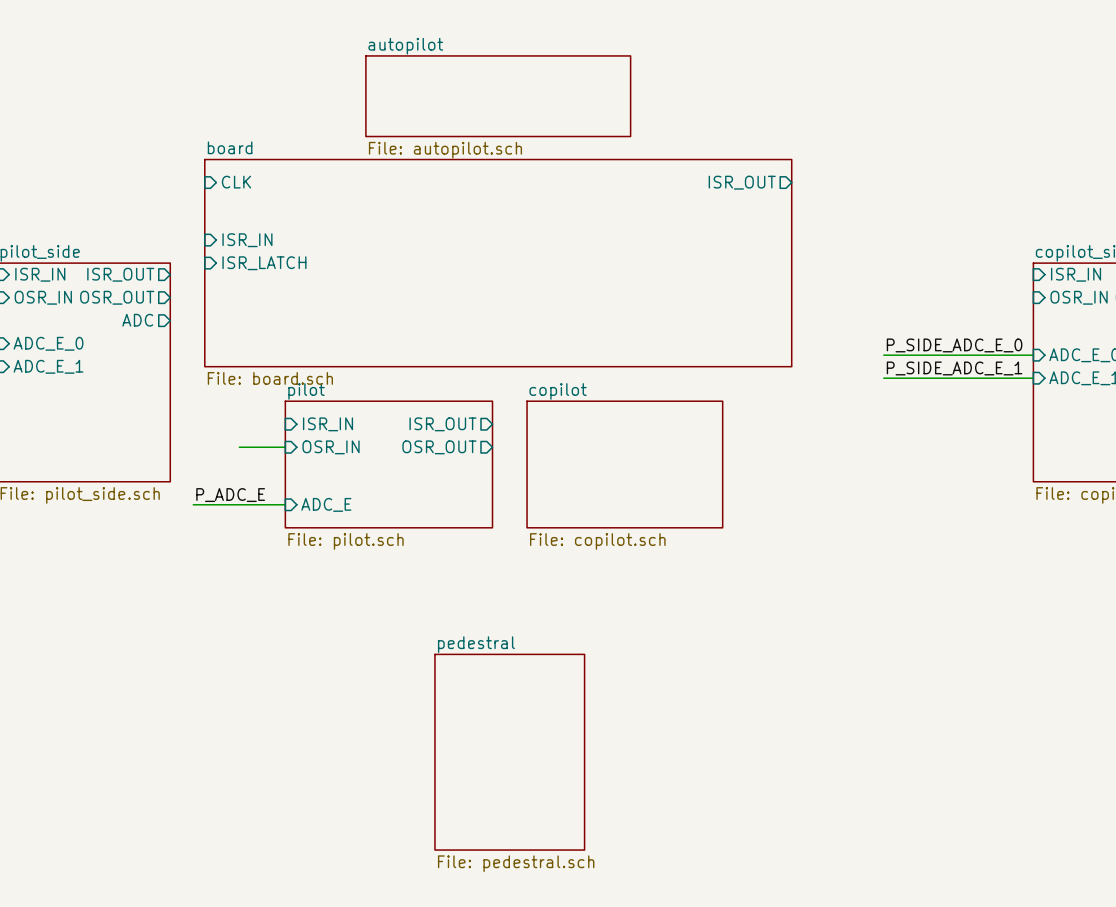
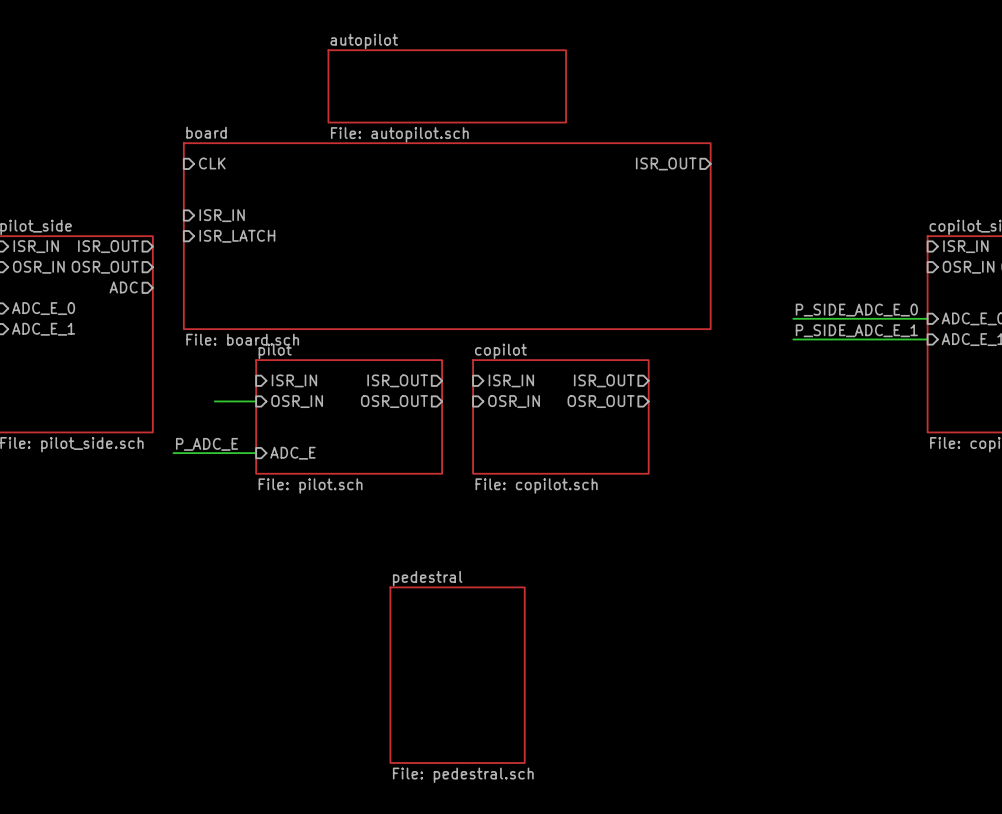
sheet pin: none -> ISR_IN (511, 380)
sheet pin: none -> ISR_OUT (604, 380)
sheet pin: none -> OSR_IN (514, 401)
sheet pin: none -> OSR_OUT (601, 401)

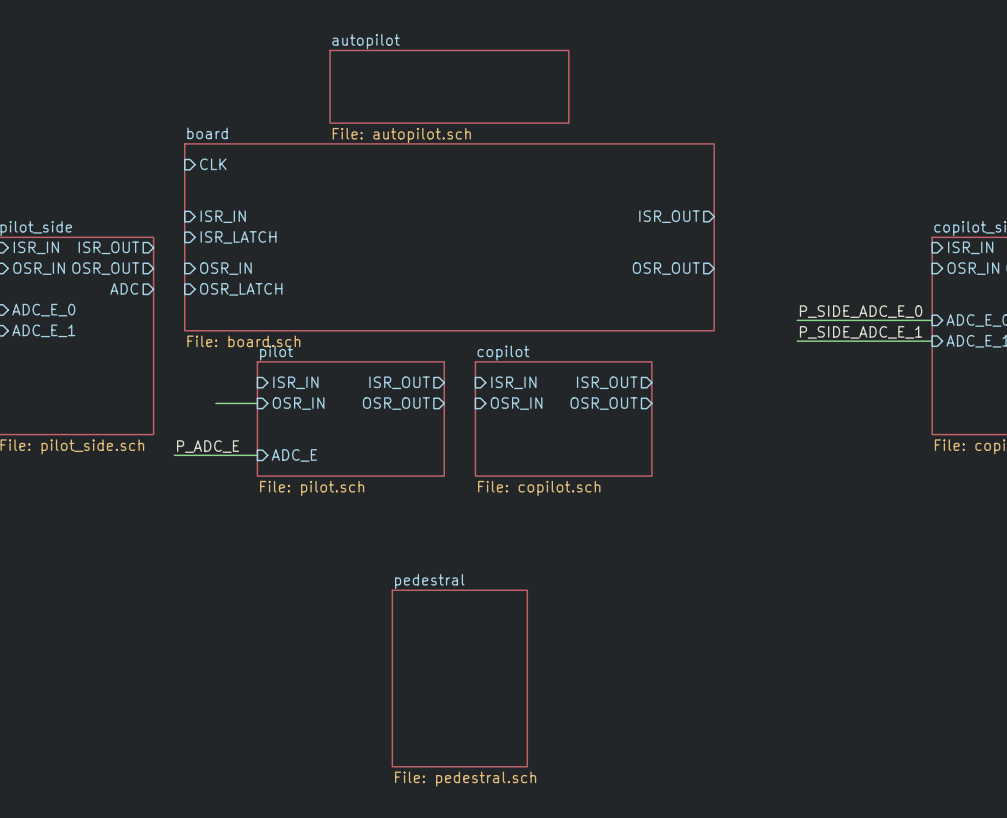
sheet pin position: ISR_OUT (666, 163) -> ISR_OUT (669, 216)
sheet pin: none -> OSR_IN (225, 268)
sheet pin: none -> OSR_OUT (666, 268)
sheet pin: none -> OSR_LATCH (241, 289)

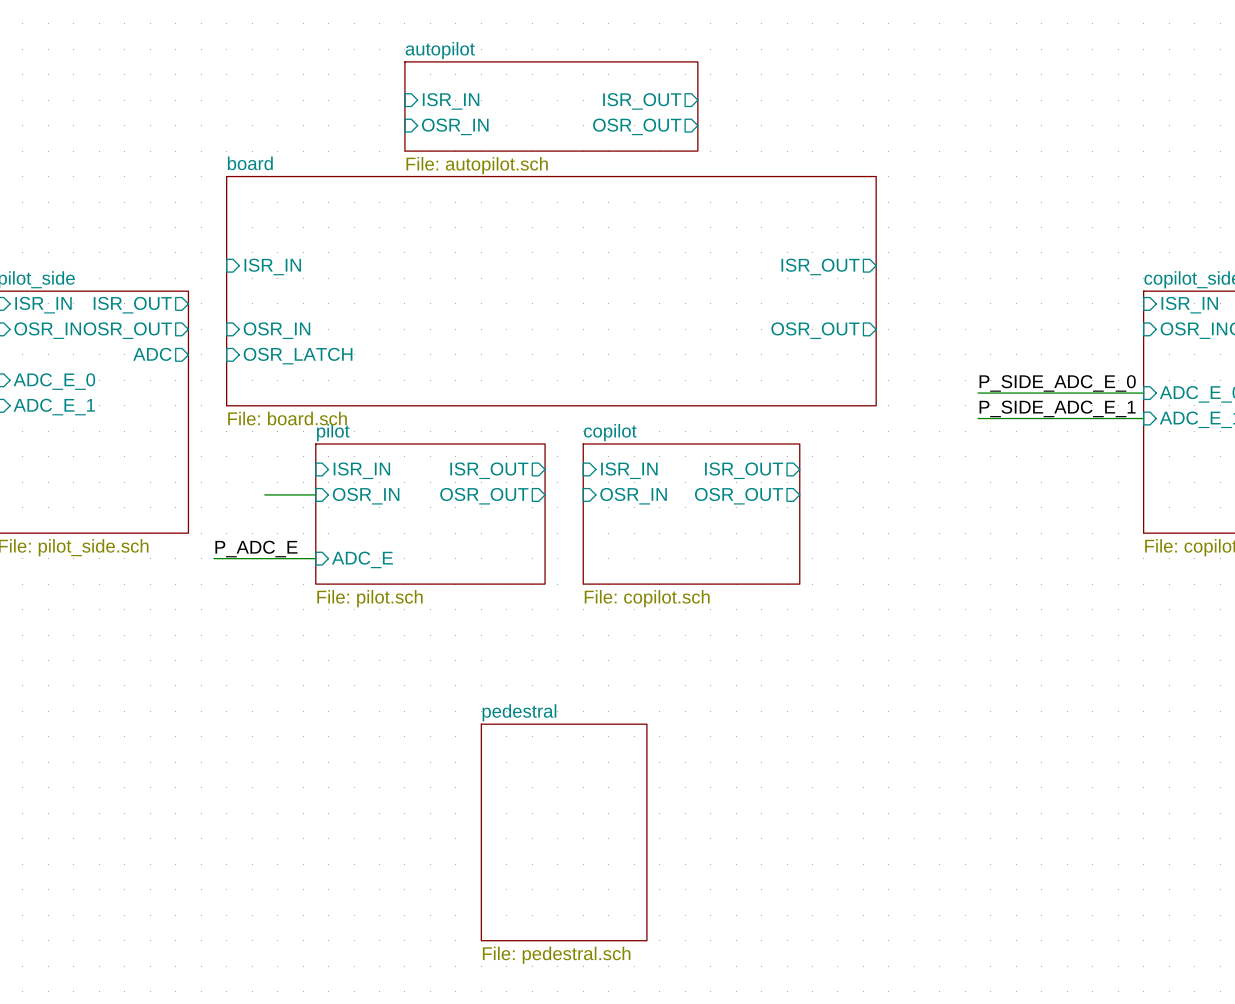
sheet pin: none -> ISR_IN (451, 101)
sheet pin: none -> ISR_OUT (642, 101)
sheet pin: none -> OSR_IN (455, 126)
sheet pin: none -> OSR_OUT (637, 126)
sheet pin: CLK (213, 164) -> none
sheet pin: ISR_LATCH (238, 237) -> none

